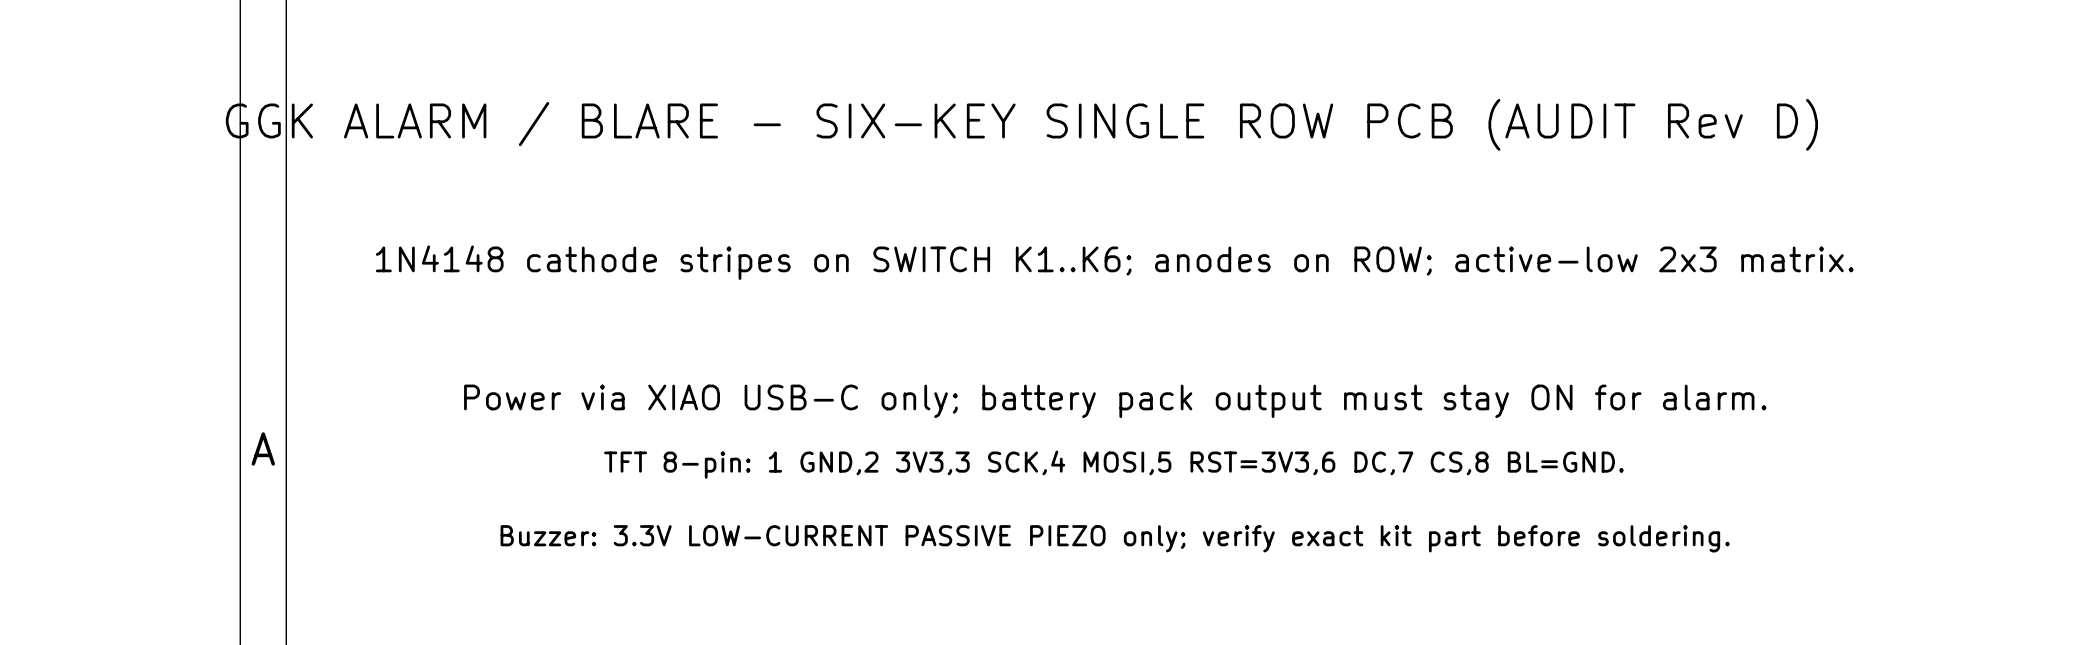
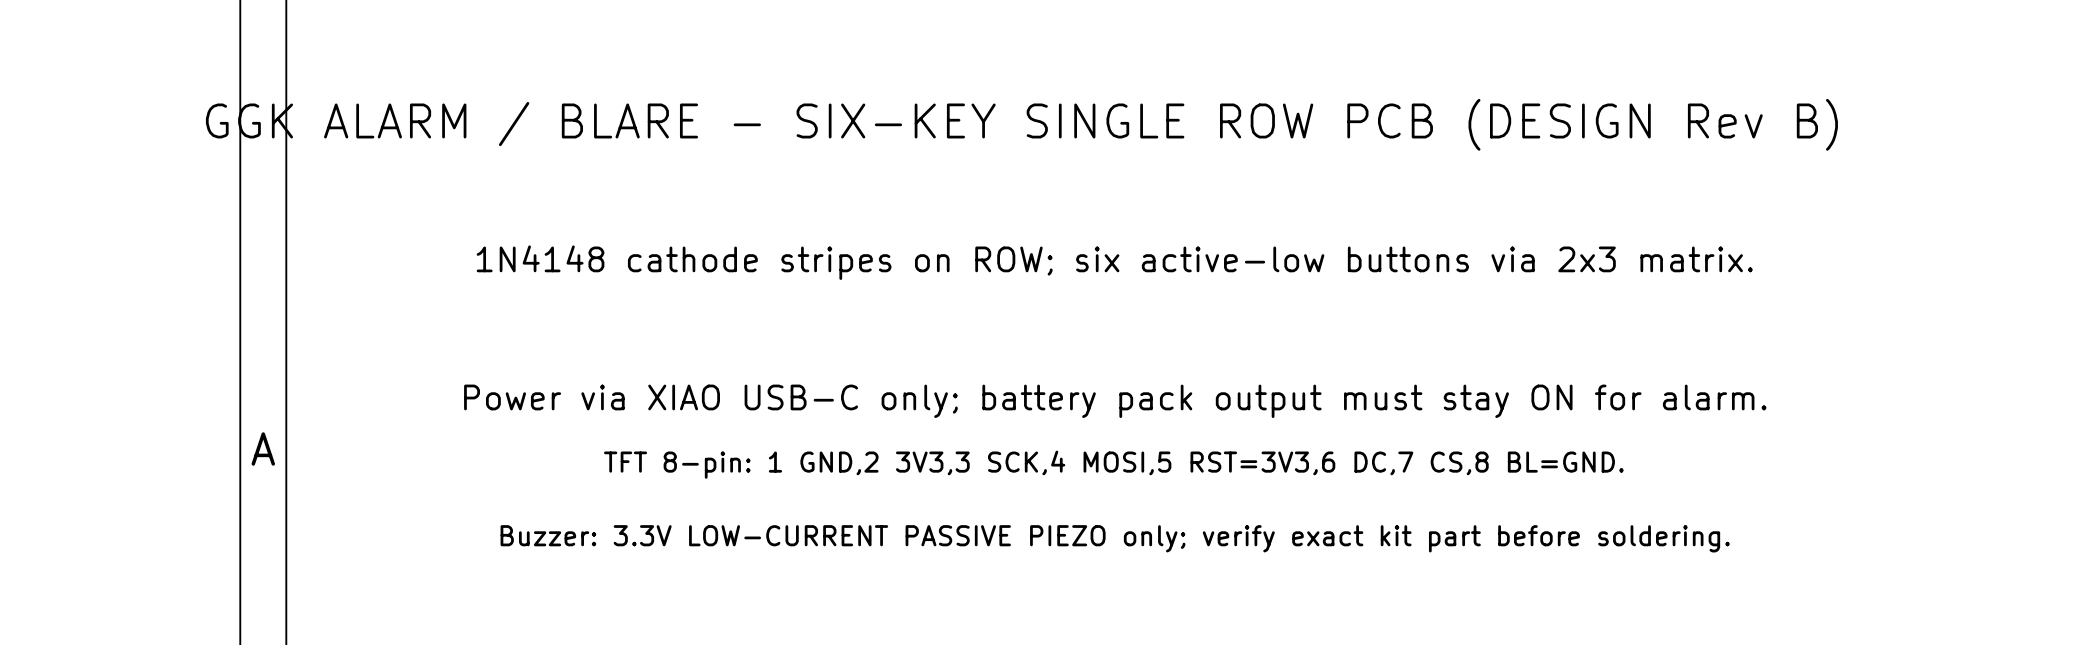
text: GGK ALARM / BLARE - SIX-KEY SINGLE ROW PCB (AUDIT Rev D) (1021, 124) -> GGK ALARM / BLARE - SIX-KEY SINGLE ROW PCB (DESIGN Rev B) (1021, 124)
text: 1N4148 cathode stripes on SWITCH K1..K6; anodes on ROW; active-low 2x3 matrix. (1114, 262) -> 1N4148 cathode stripes on ROW; six active-low buttons via 2x3 matrix. (1114, 262)

